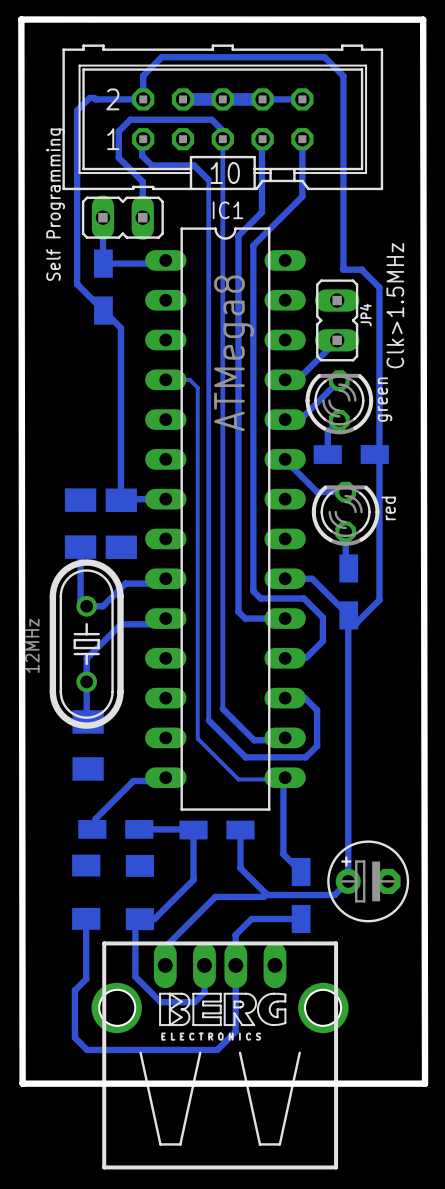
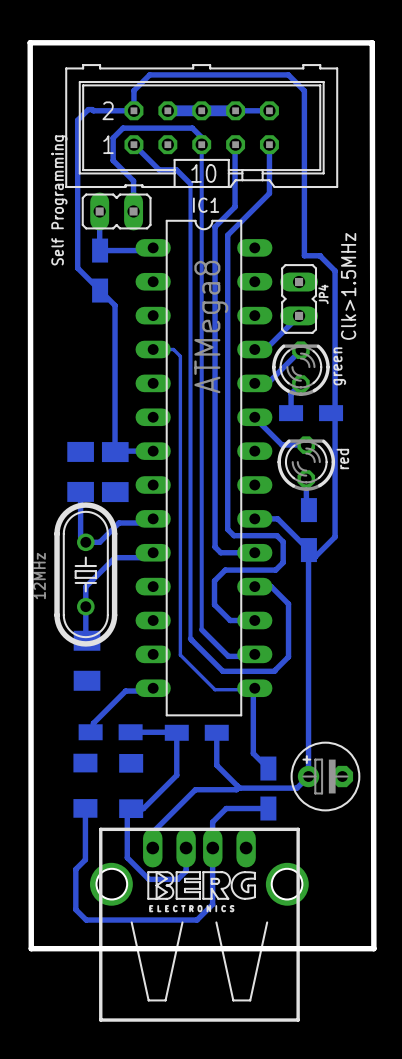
bottom track: (143, 139) (142, 155) (151, 165) (194, 165) (208, 180) (208, 720) (245, 757) (305, 757) (317, 746) (317, 710) (305, 698) (285, 698) -> (133, 144) (159, 169) (176, 169) (190, 183) (191, 639)
bottom track: (303, 598) (322, 617) (322, 641) (306, 657) (285, 658) -> (270, 535) (276, 535) (283, 541) (283, 562) (275, 570) (225, 570) (214, 580) (214, 604) (230, 620) (254, 620)
bottom track: none -> (254, 586) (271, 586) (288, 603) (288, 656) (274, 671) (222, 671) (191, 639)

